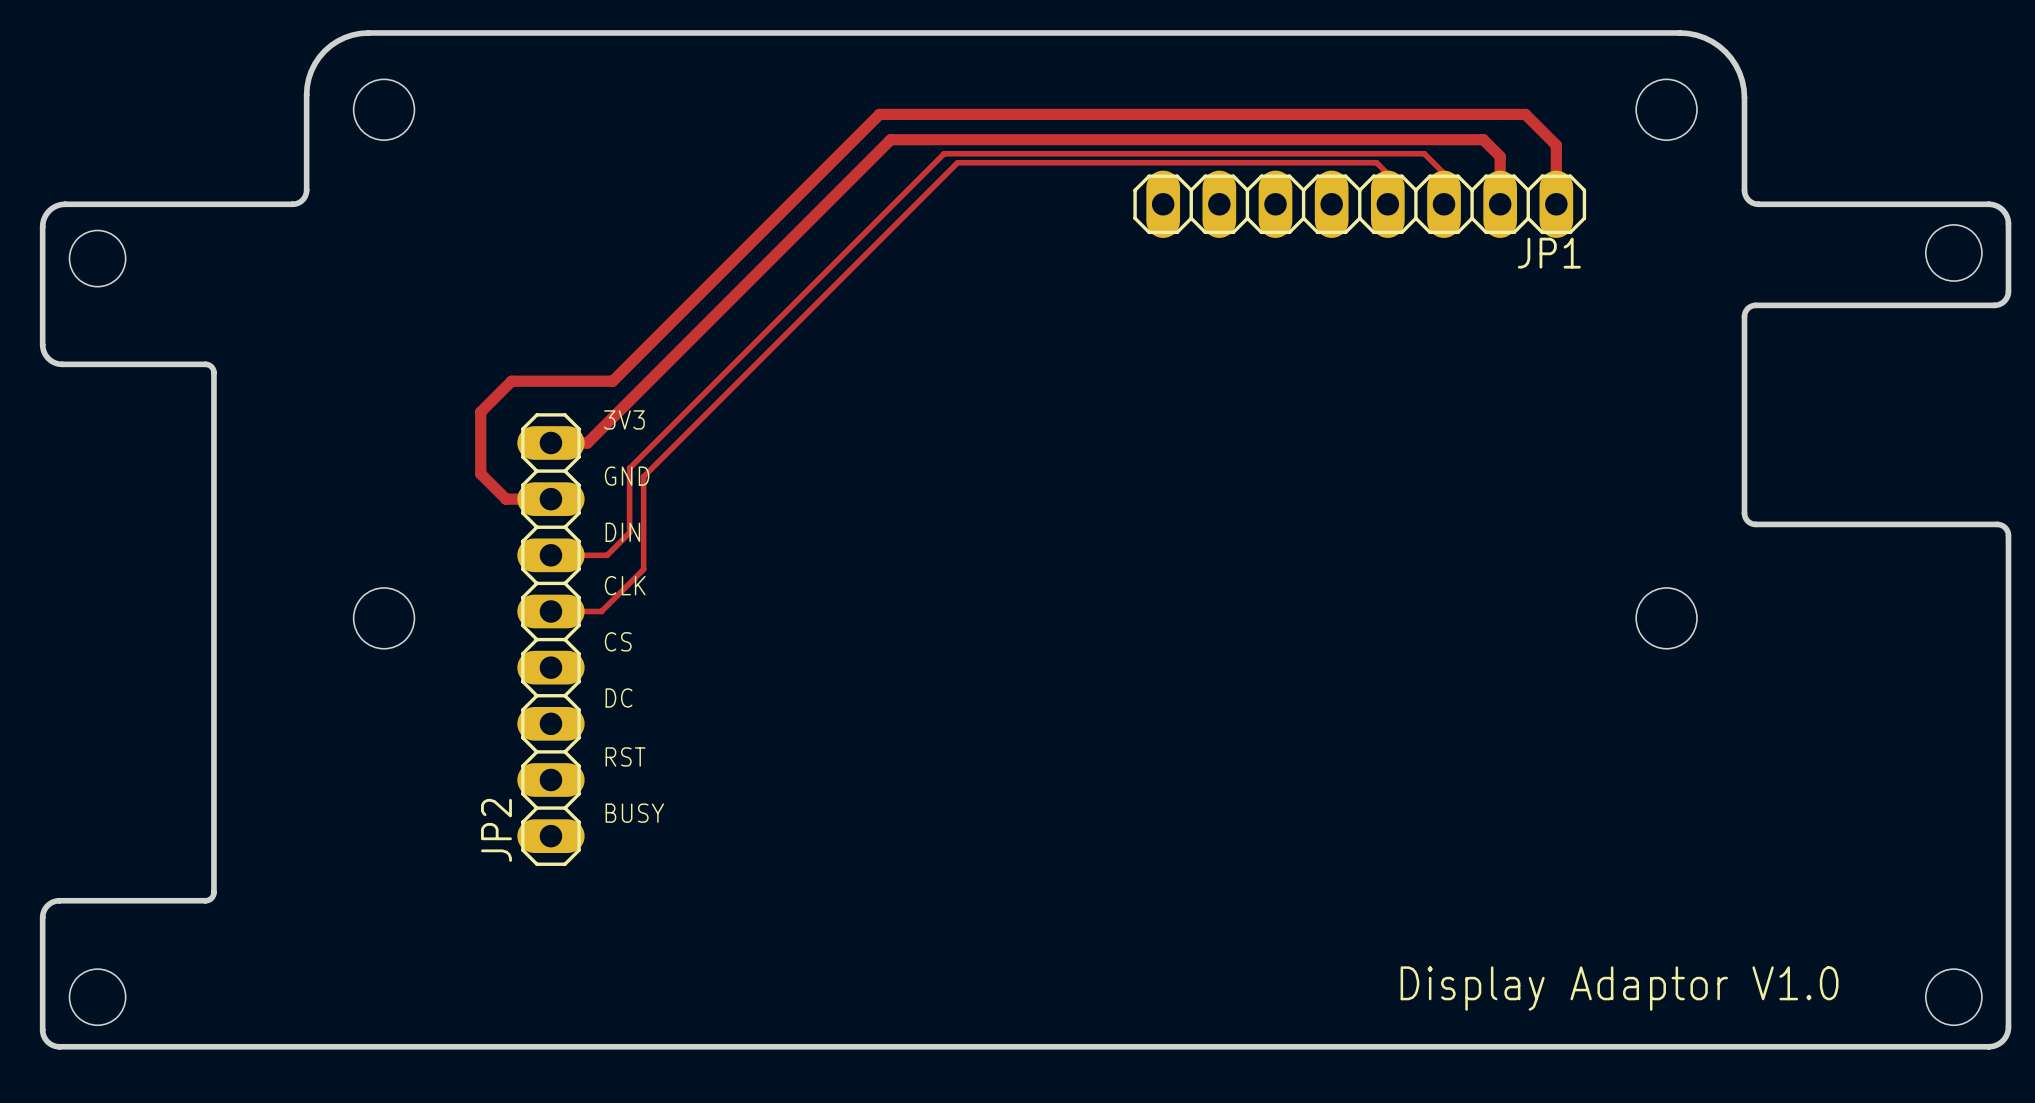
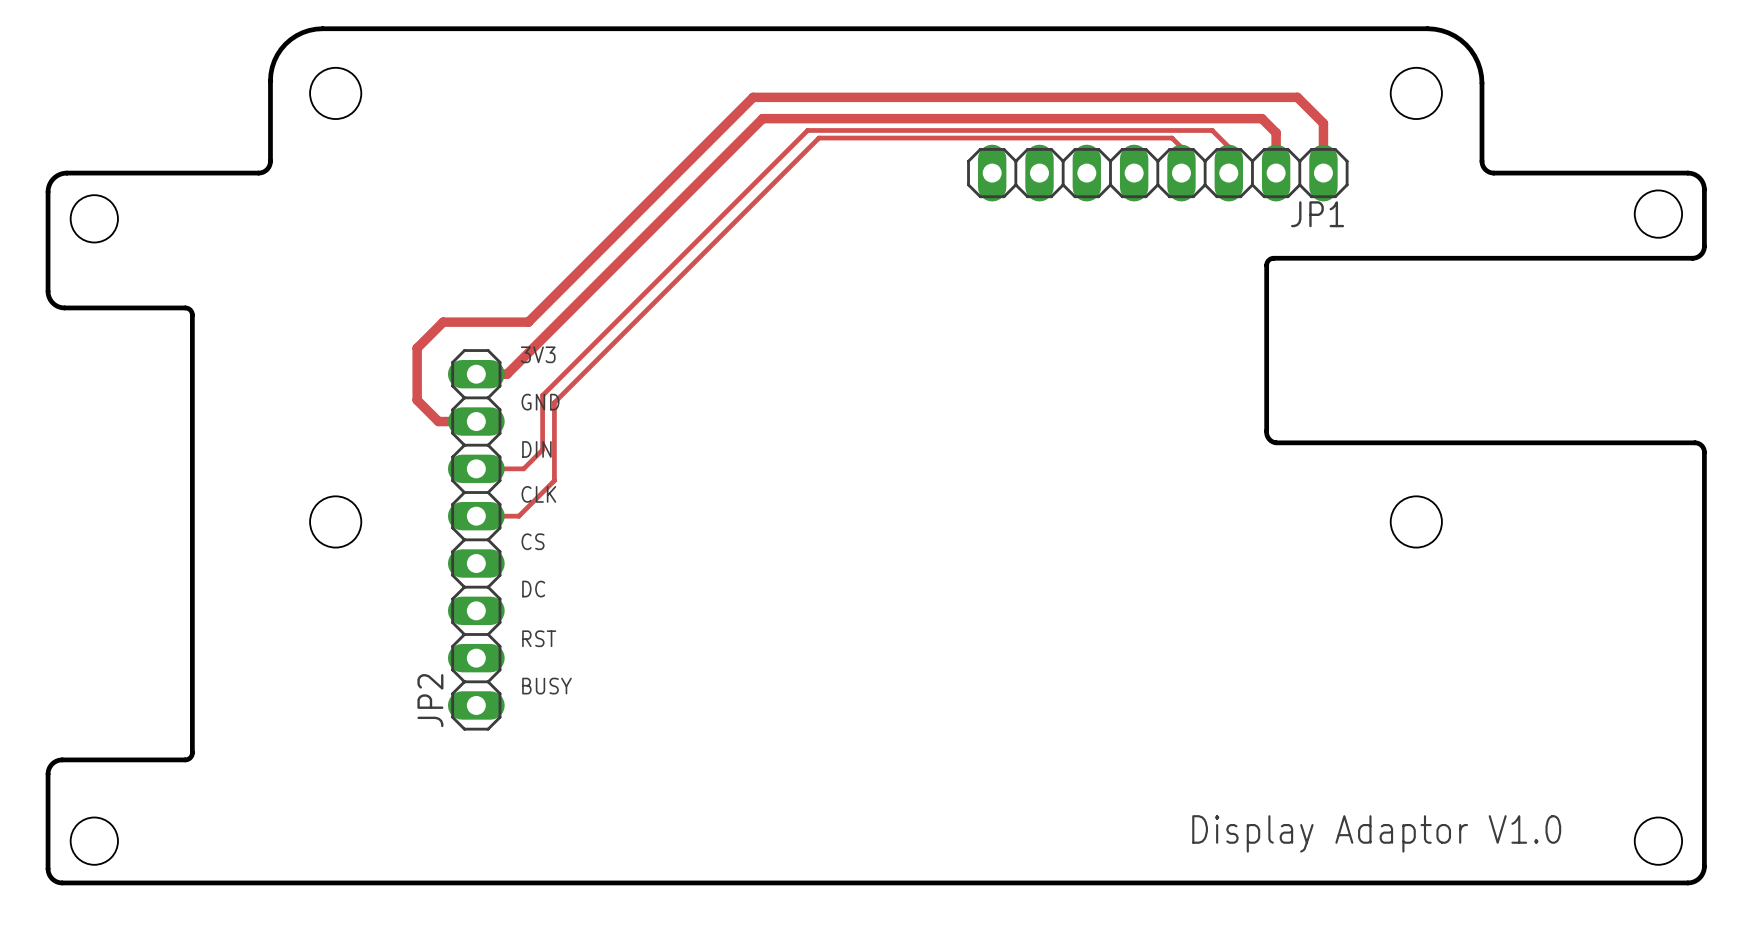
board edge: (1755, 305) (1747, 308) (1744, 316) (1744, 513) (1747, 521) (1755, 524) -> (1491, 258) (1269, 259) (1266, 265) (1266, 432) (1268, 438) (1276, 442) (1491, 442)

